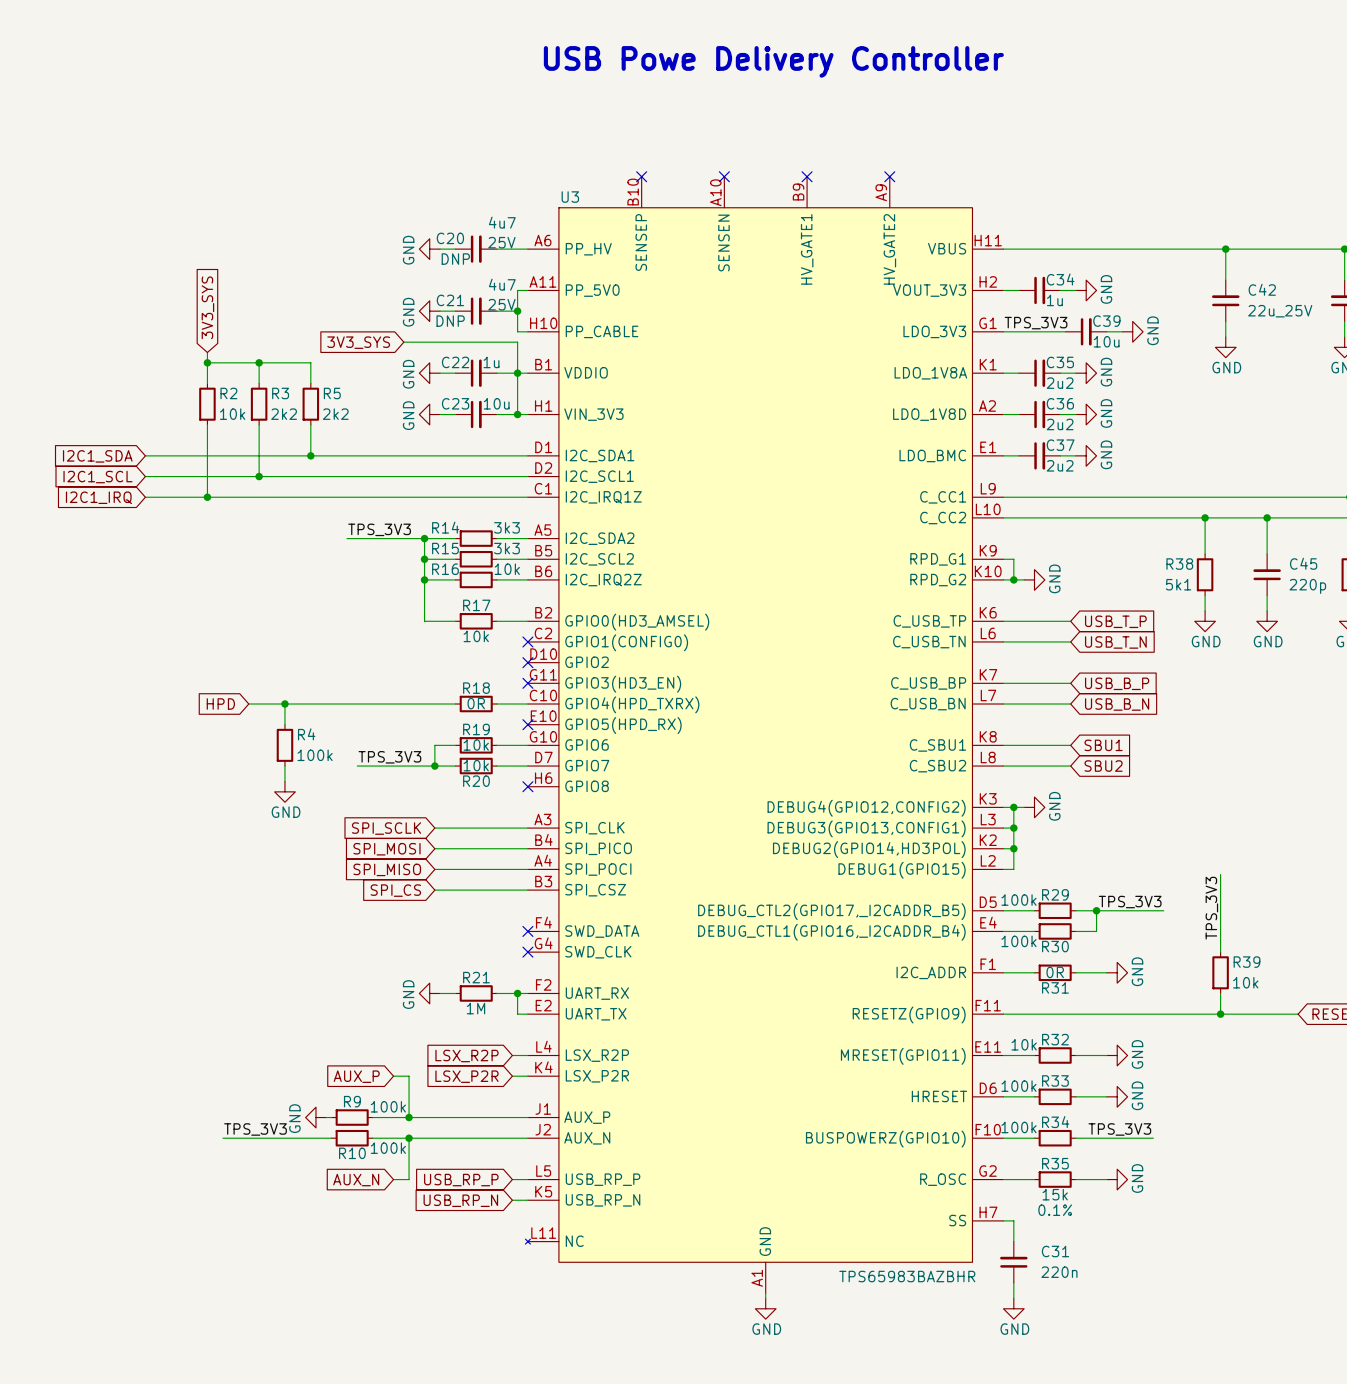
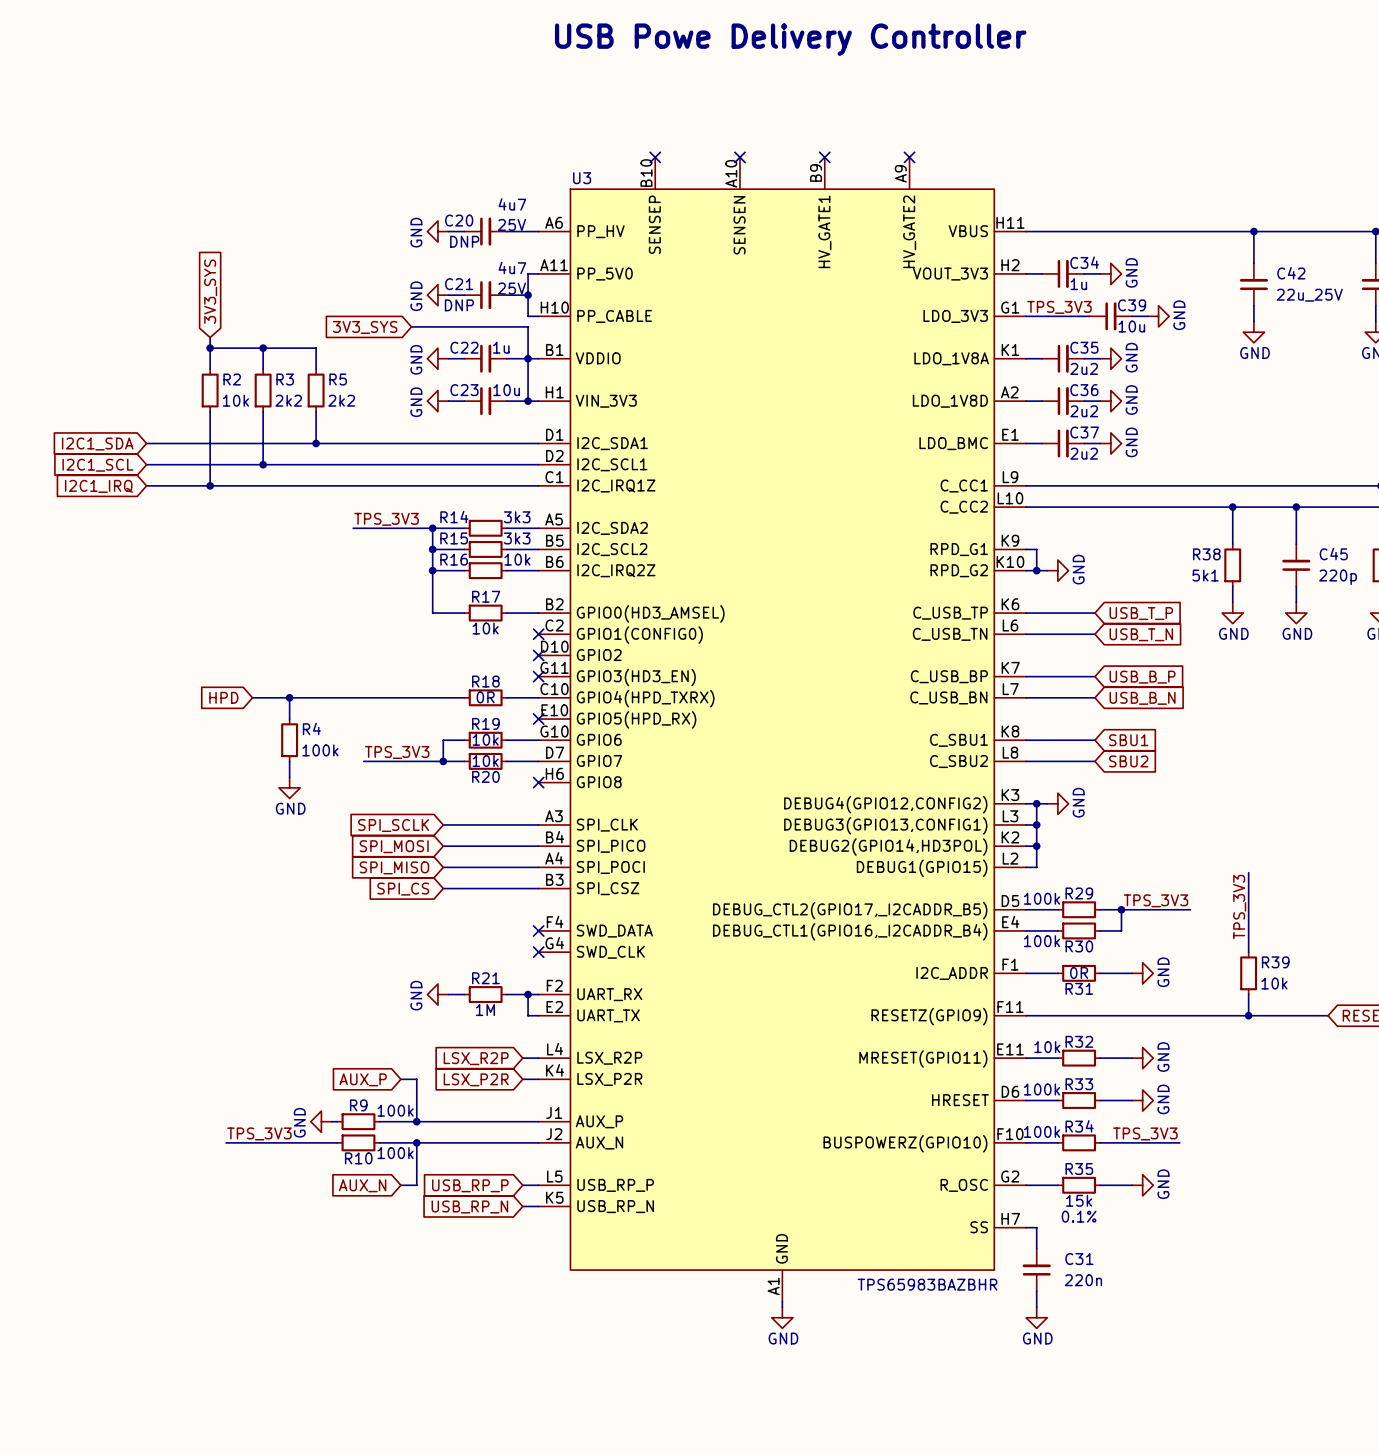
U3 symbol: [525, 176, 1004, 1294] -> [538, 157, 1027, 1302]

